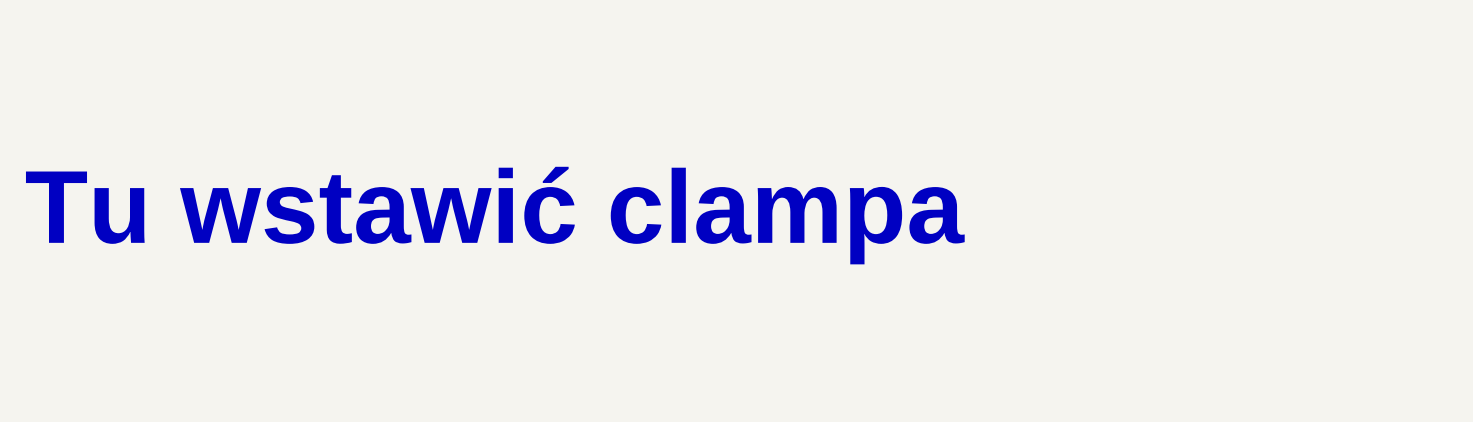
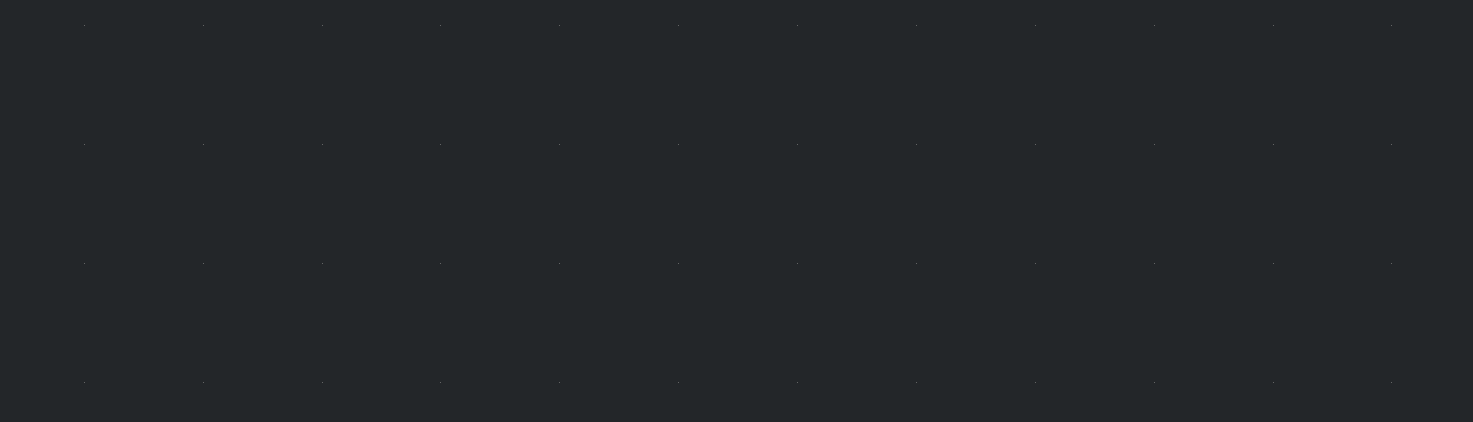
text: Tu wstawić clampa (495, 215) -> none

